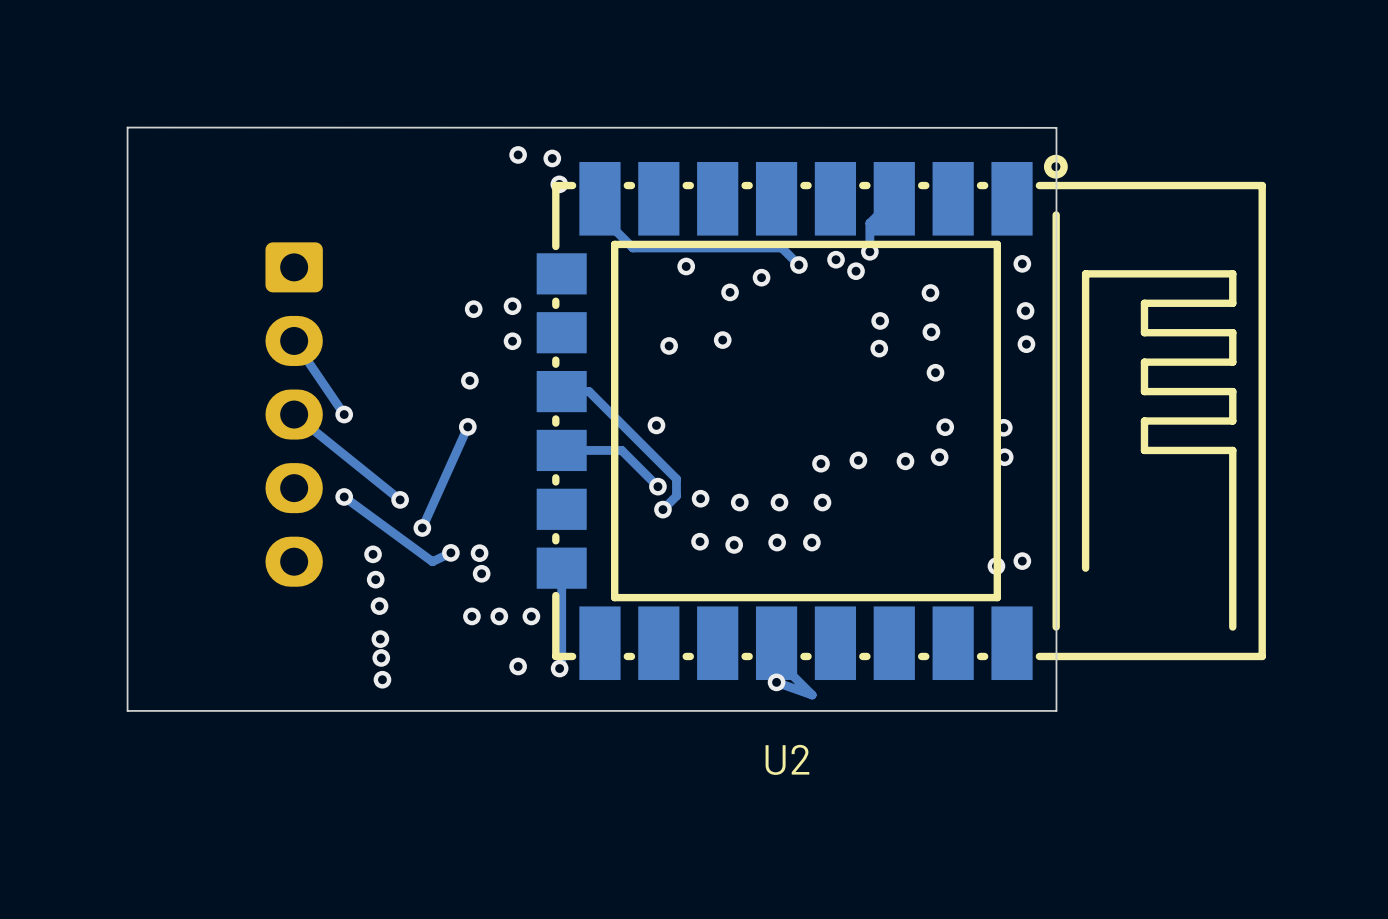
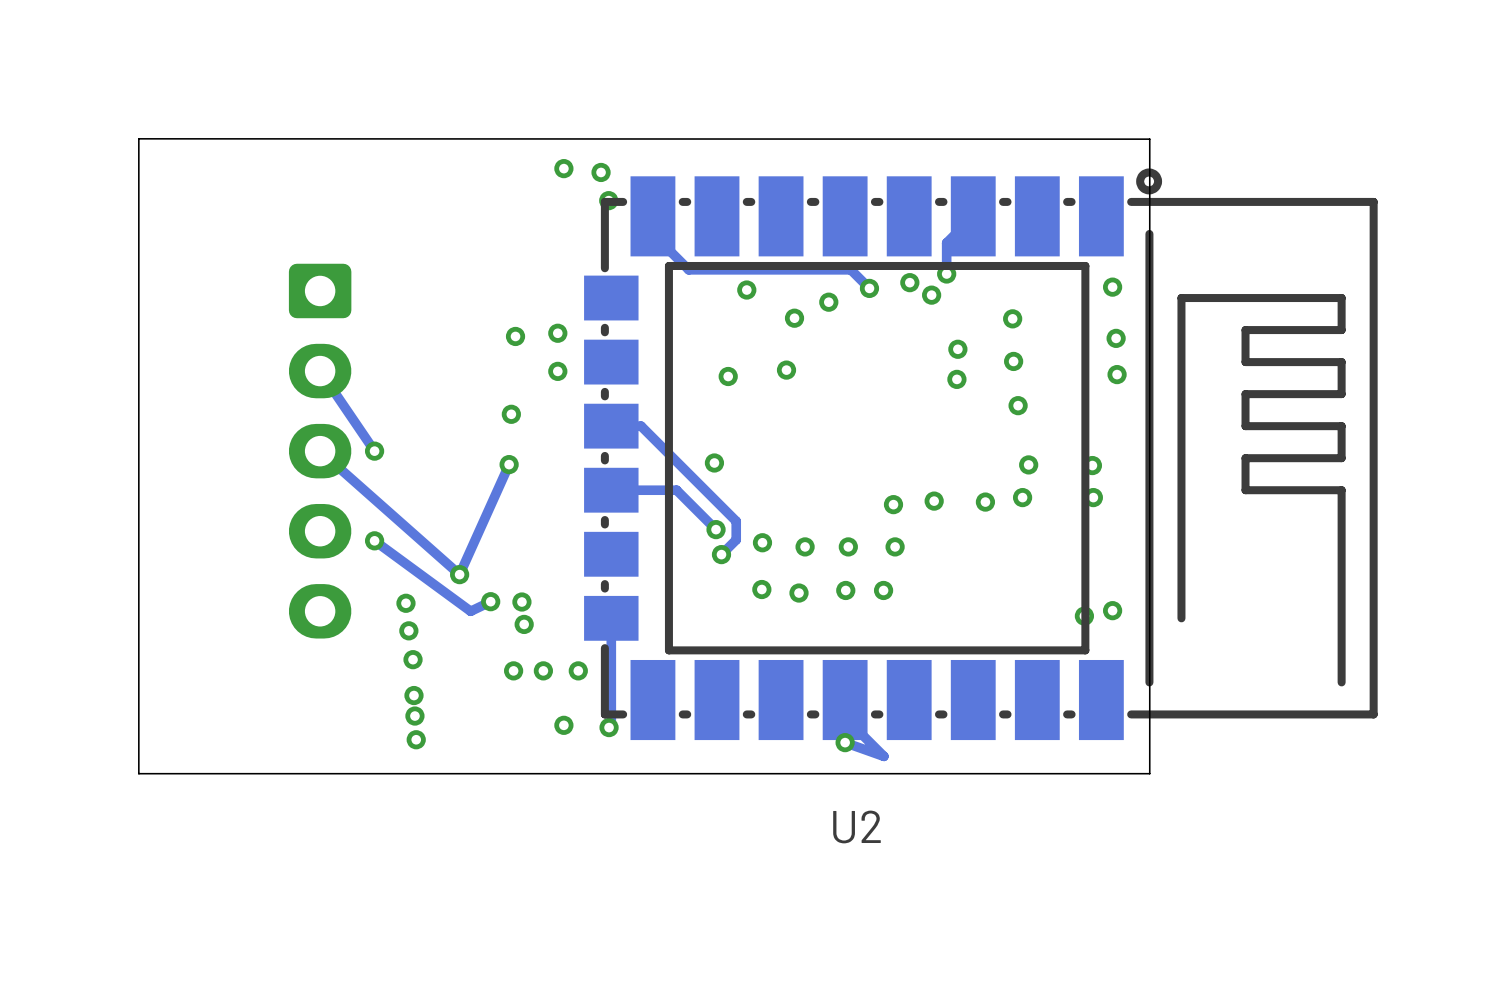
track: (294, 414) (400, 499) -> (320, 451) (459, 574)
via: (400, 499) -> none

